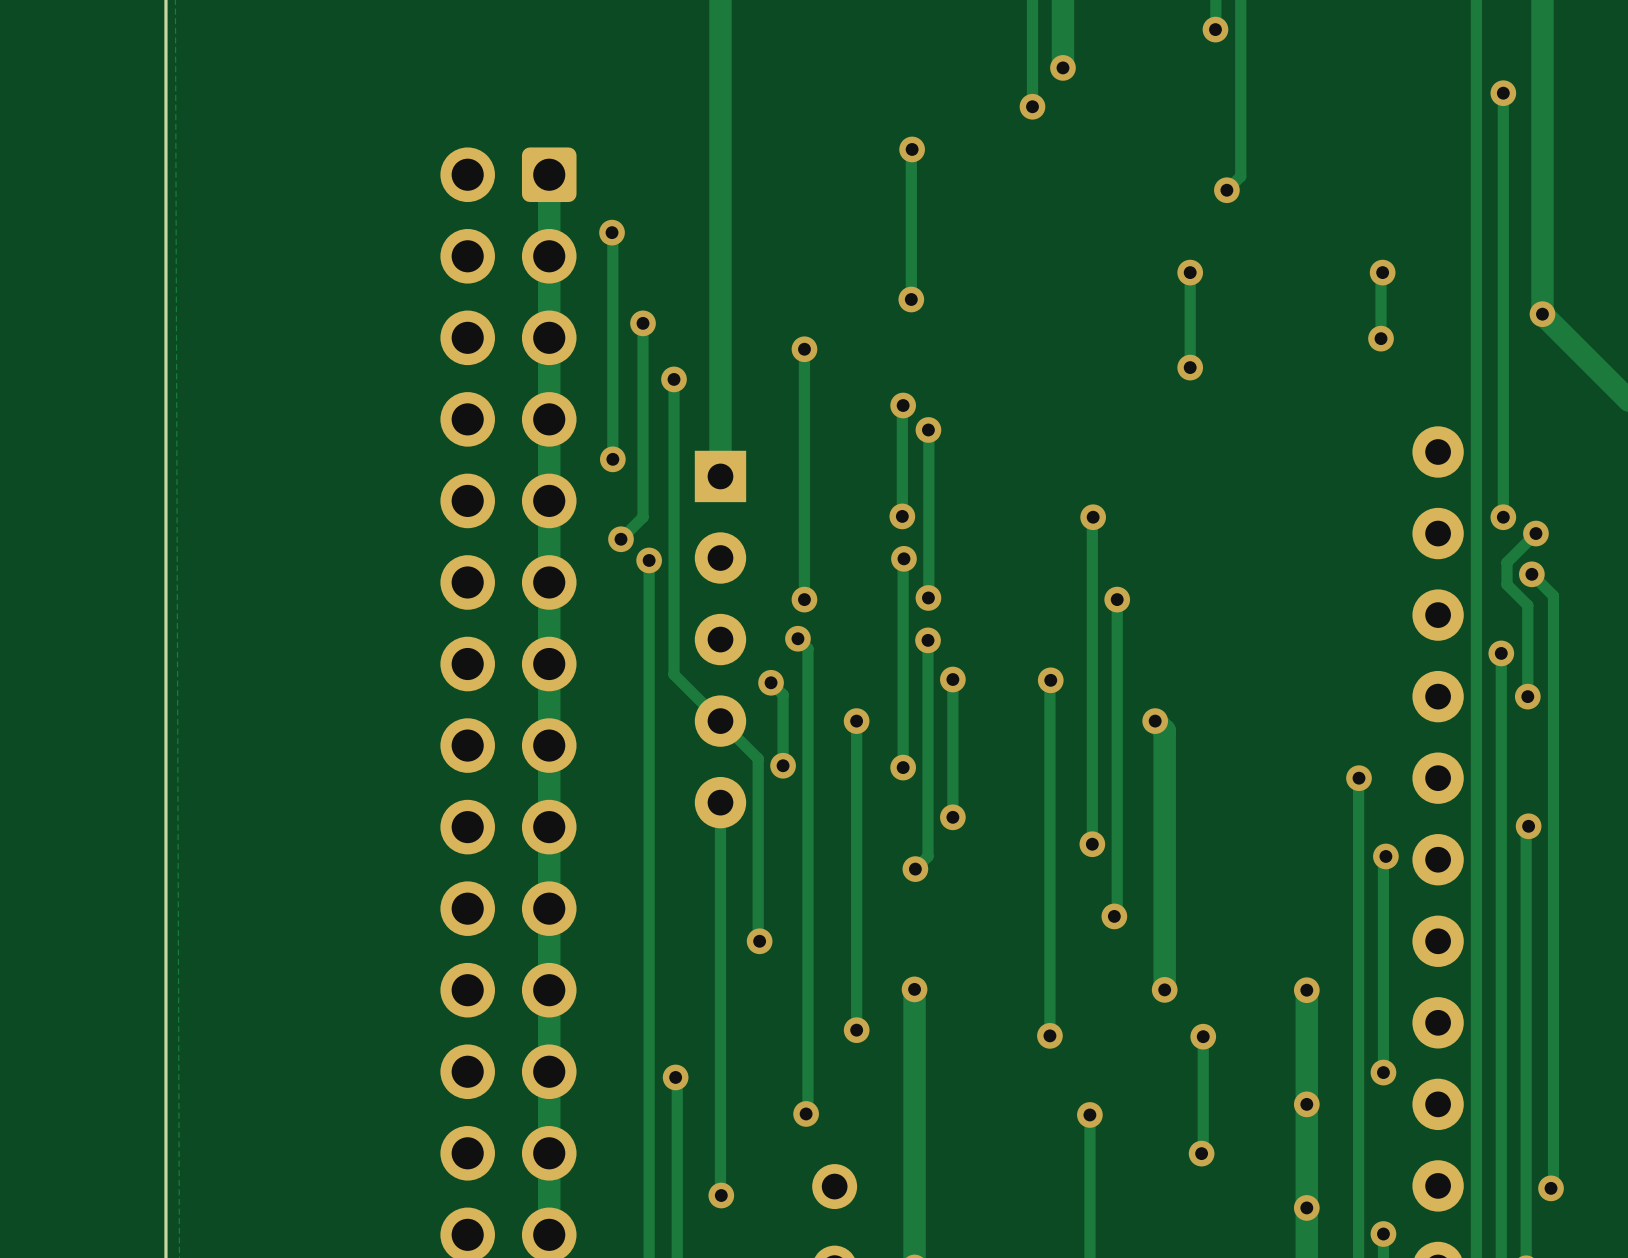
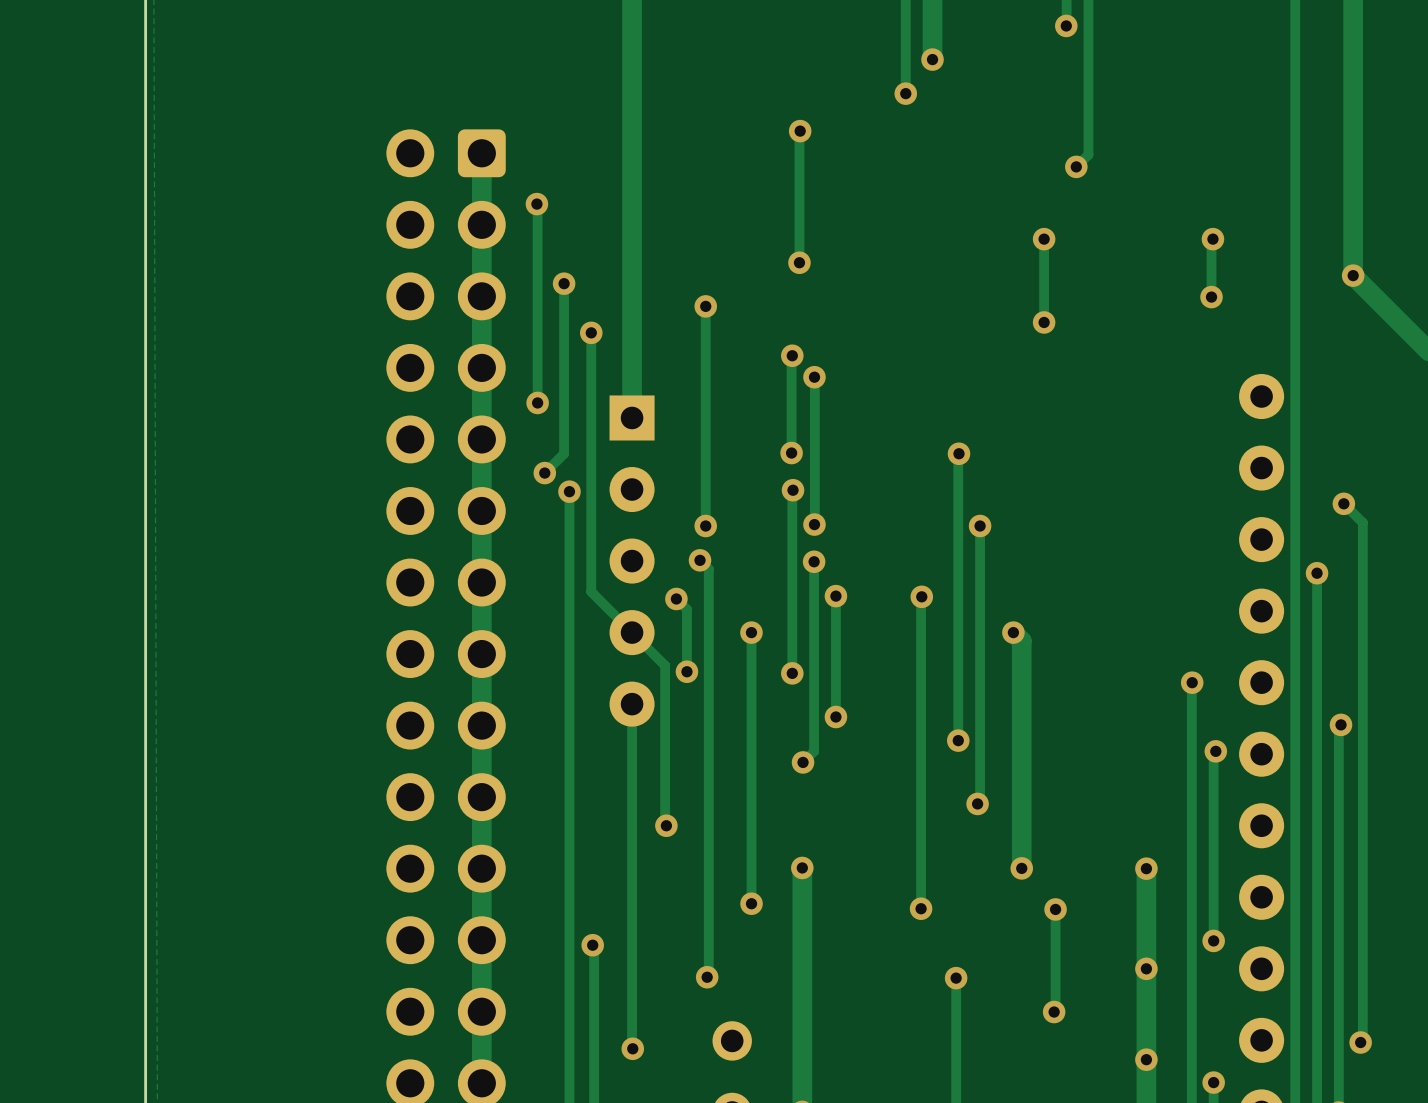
track: (1503, 93) (1503, 517) -> none
via: (1503, 93) -> none
via: (1503, 517) -> none
track: (1535, 533) (1506, 562) (1506, 584) (1527, 605) (1527, 696) -> none
via: (1535, 533) -> none
via: (1527, 696) -> none

